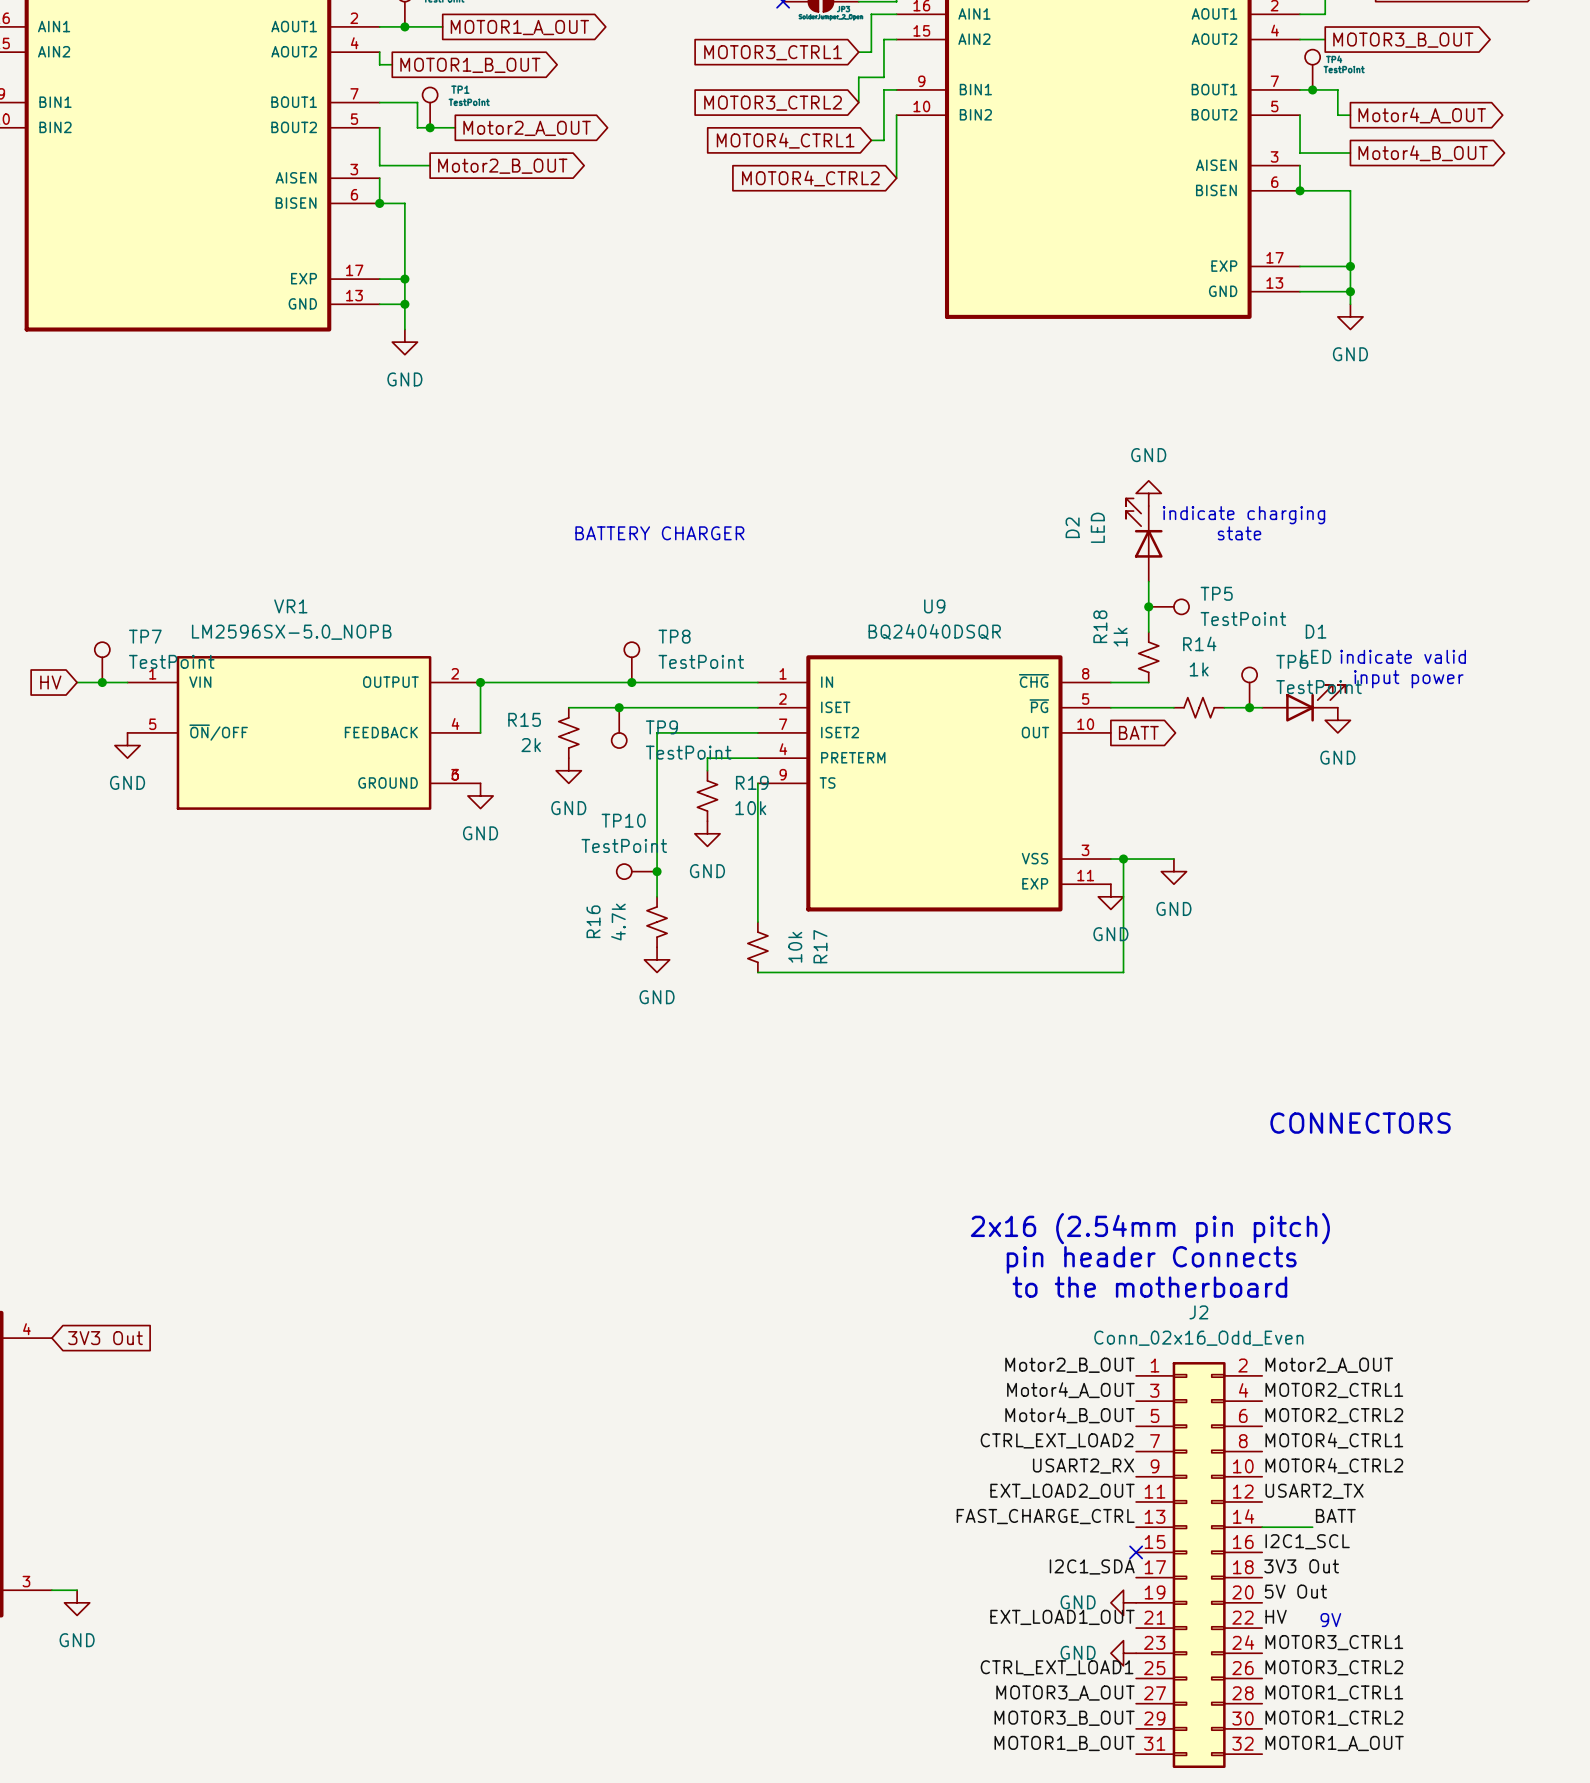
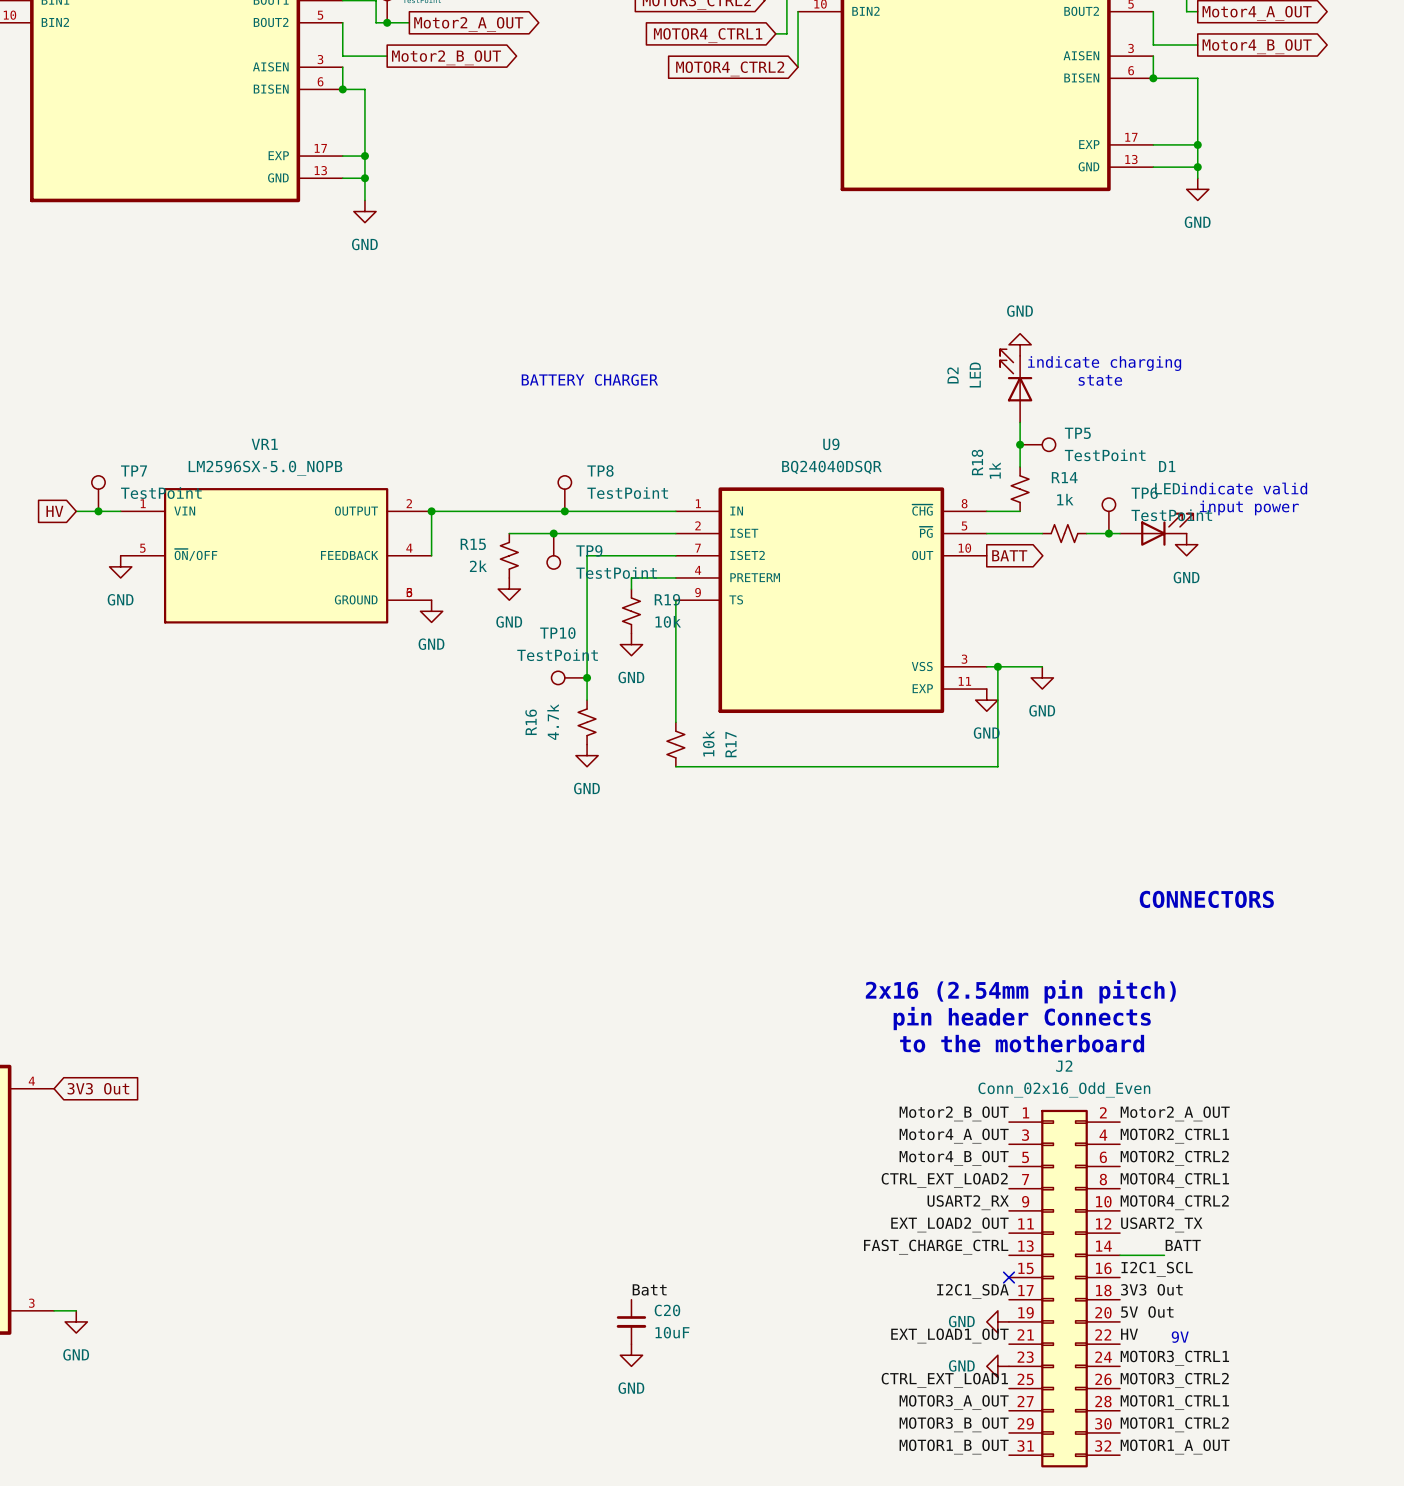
label: none -> Batt (649, 1289)
C20: none -> 10uF (631, 1321)
power symbol: none -> GND (631, 1355)

